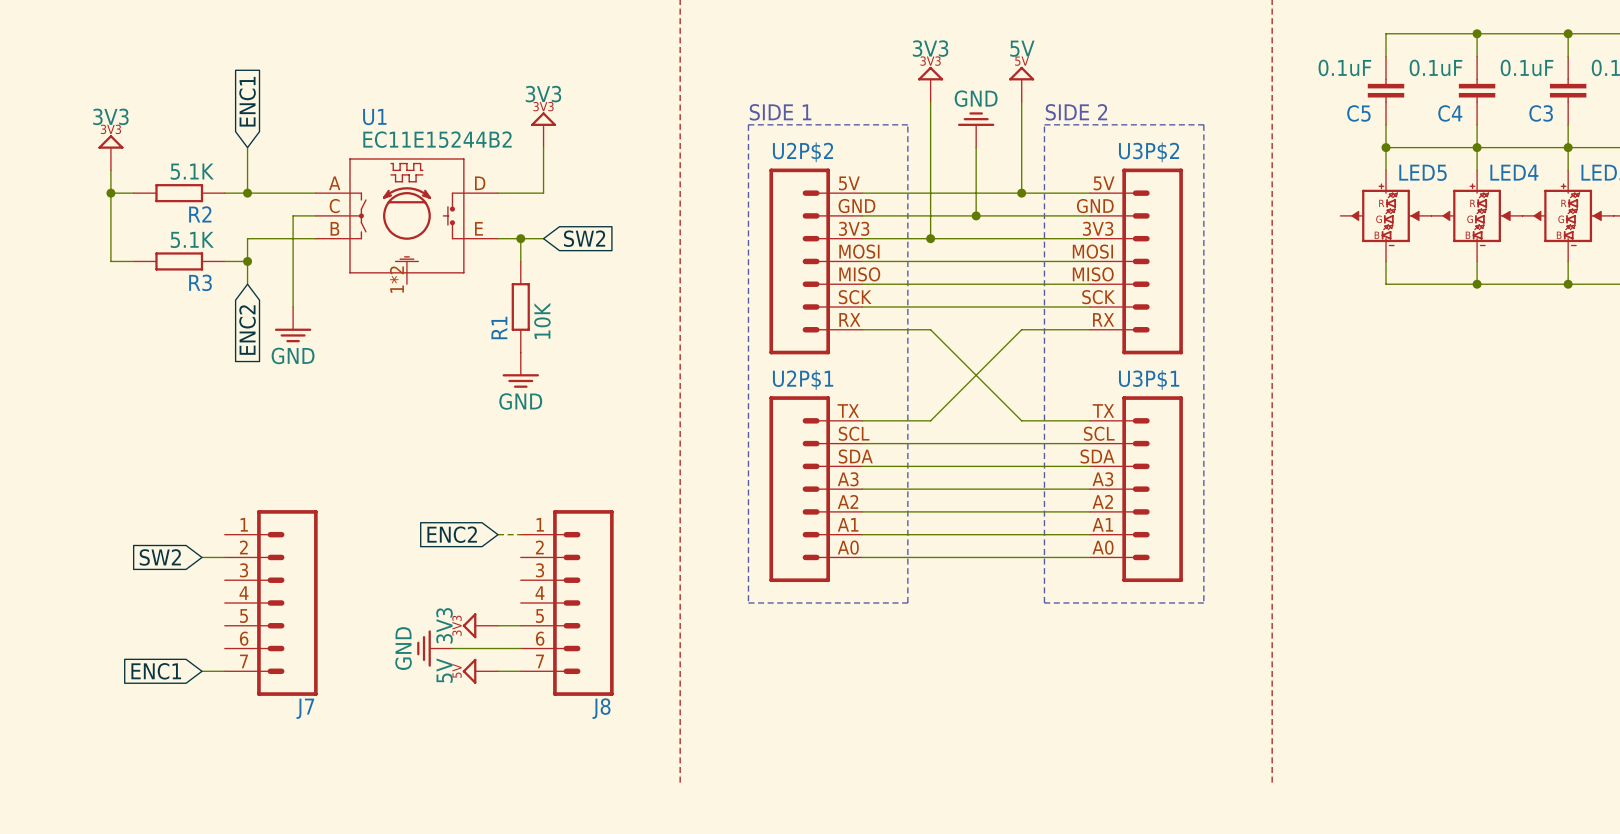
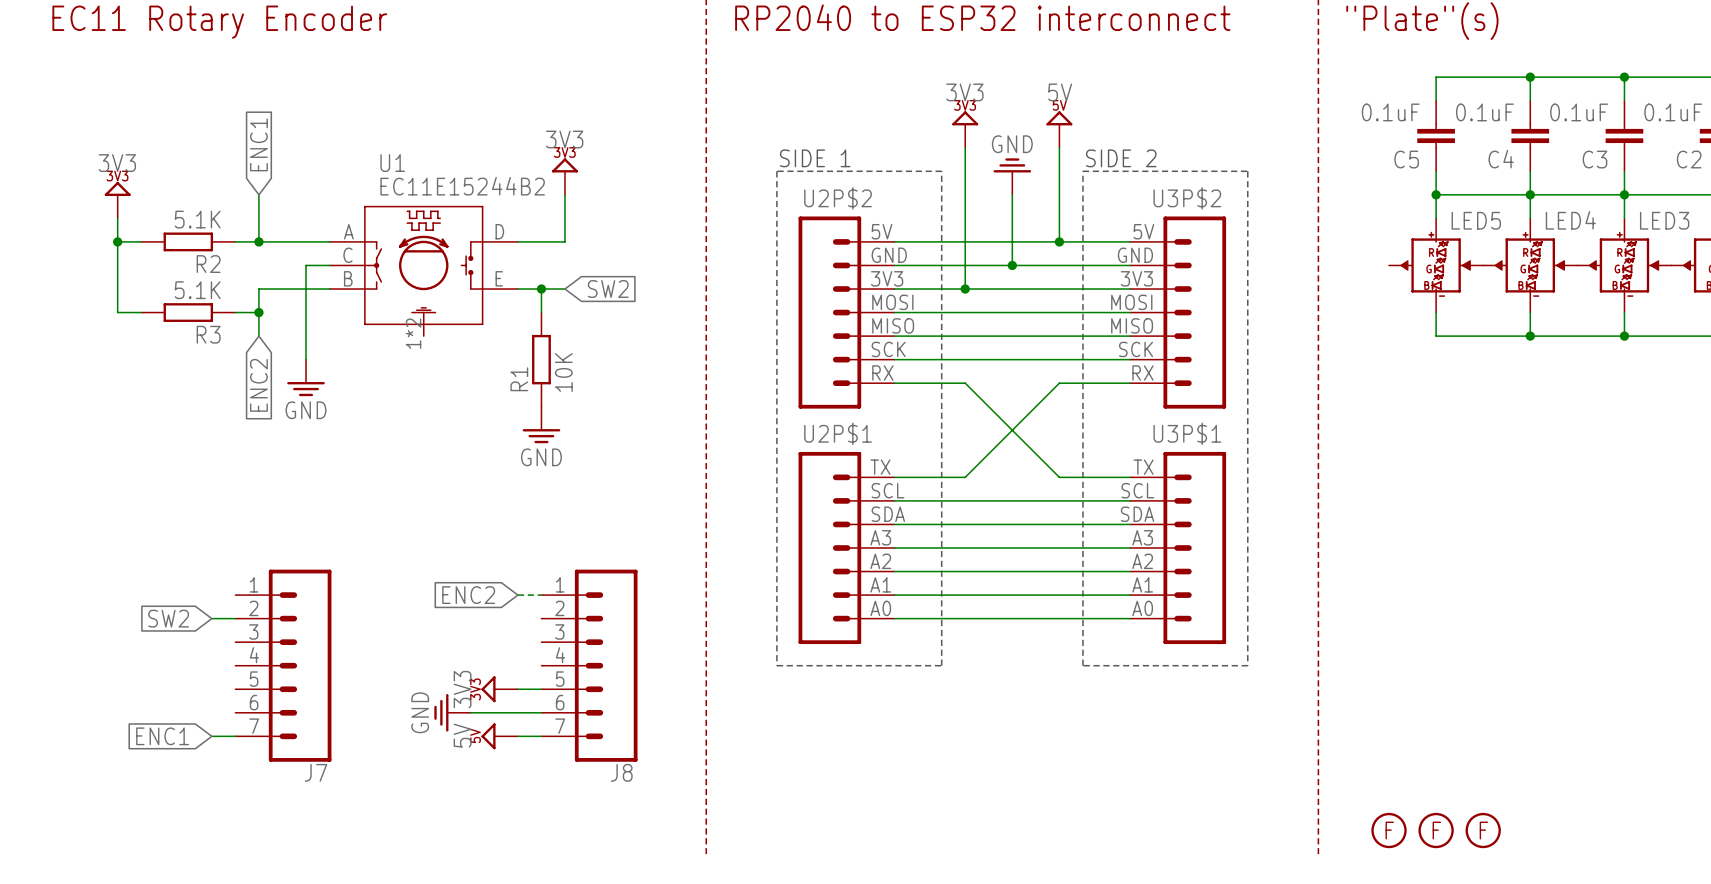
part: none -> (1389, 830)
part: none -> (1436, 830)
part: none -> (1483, 830)

